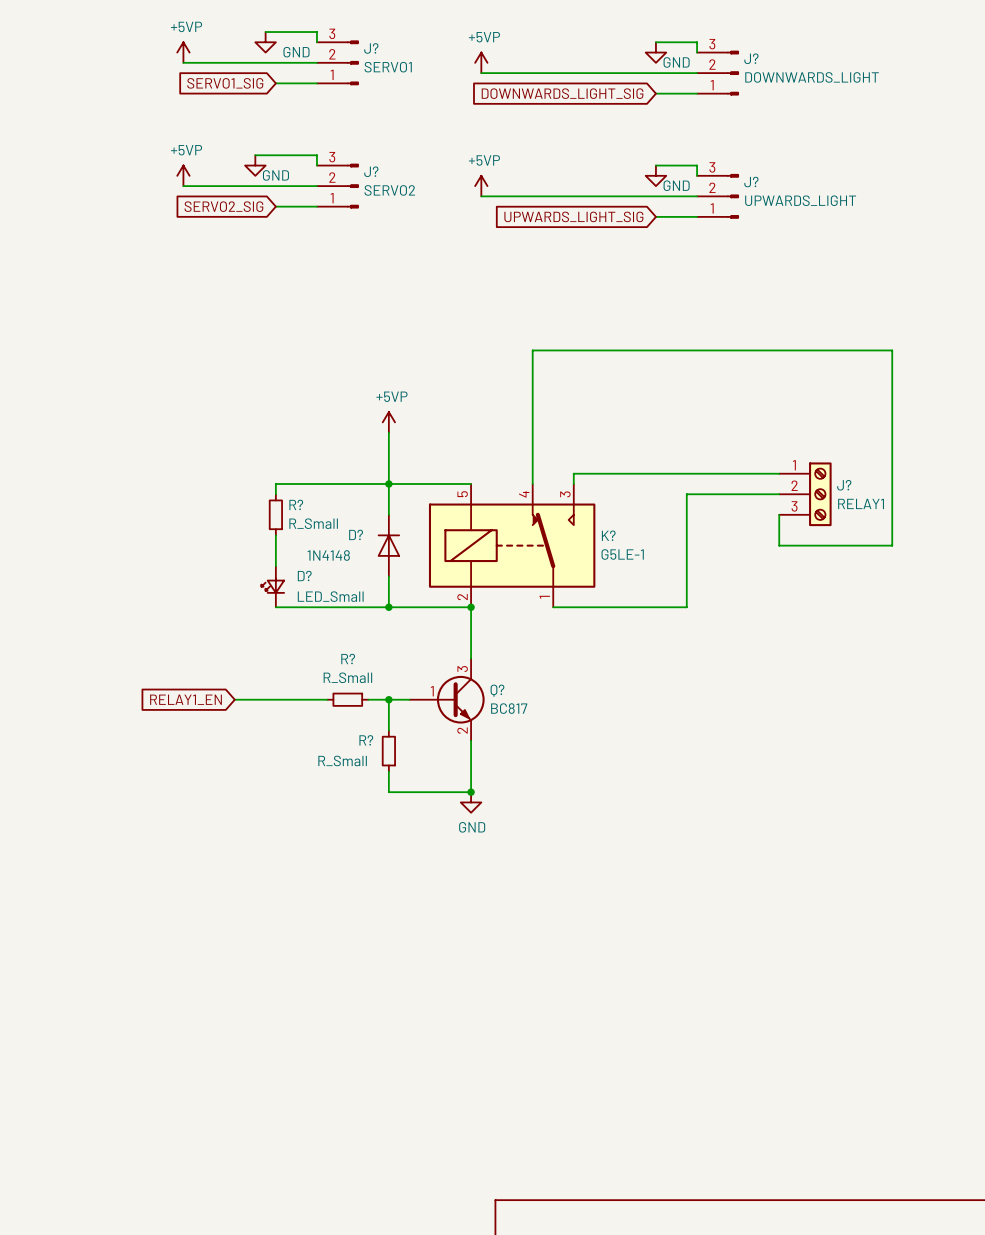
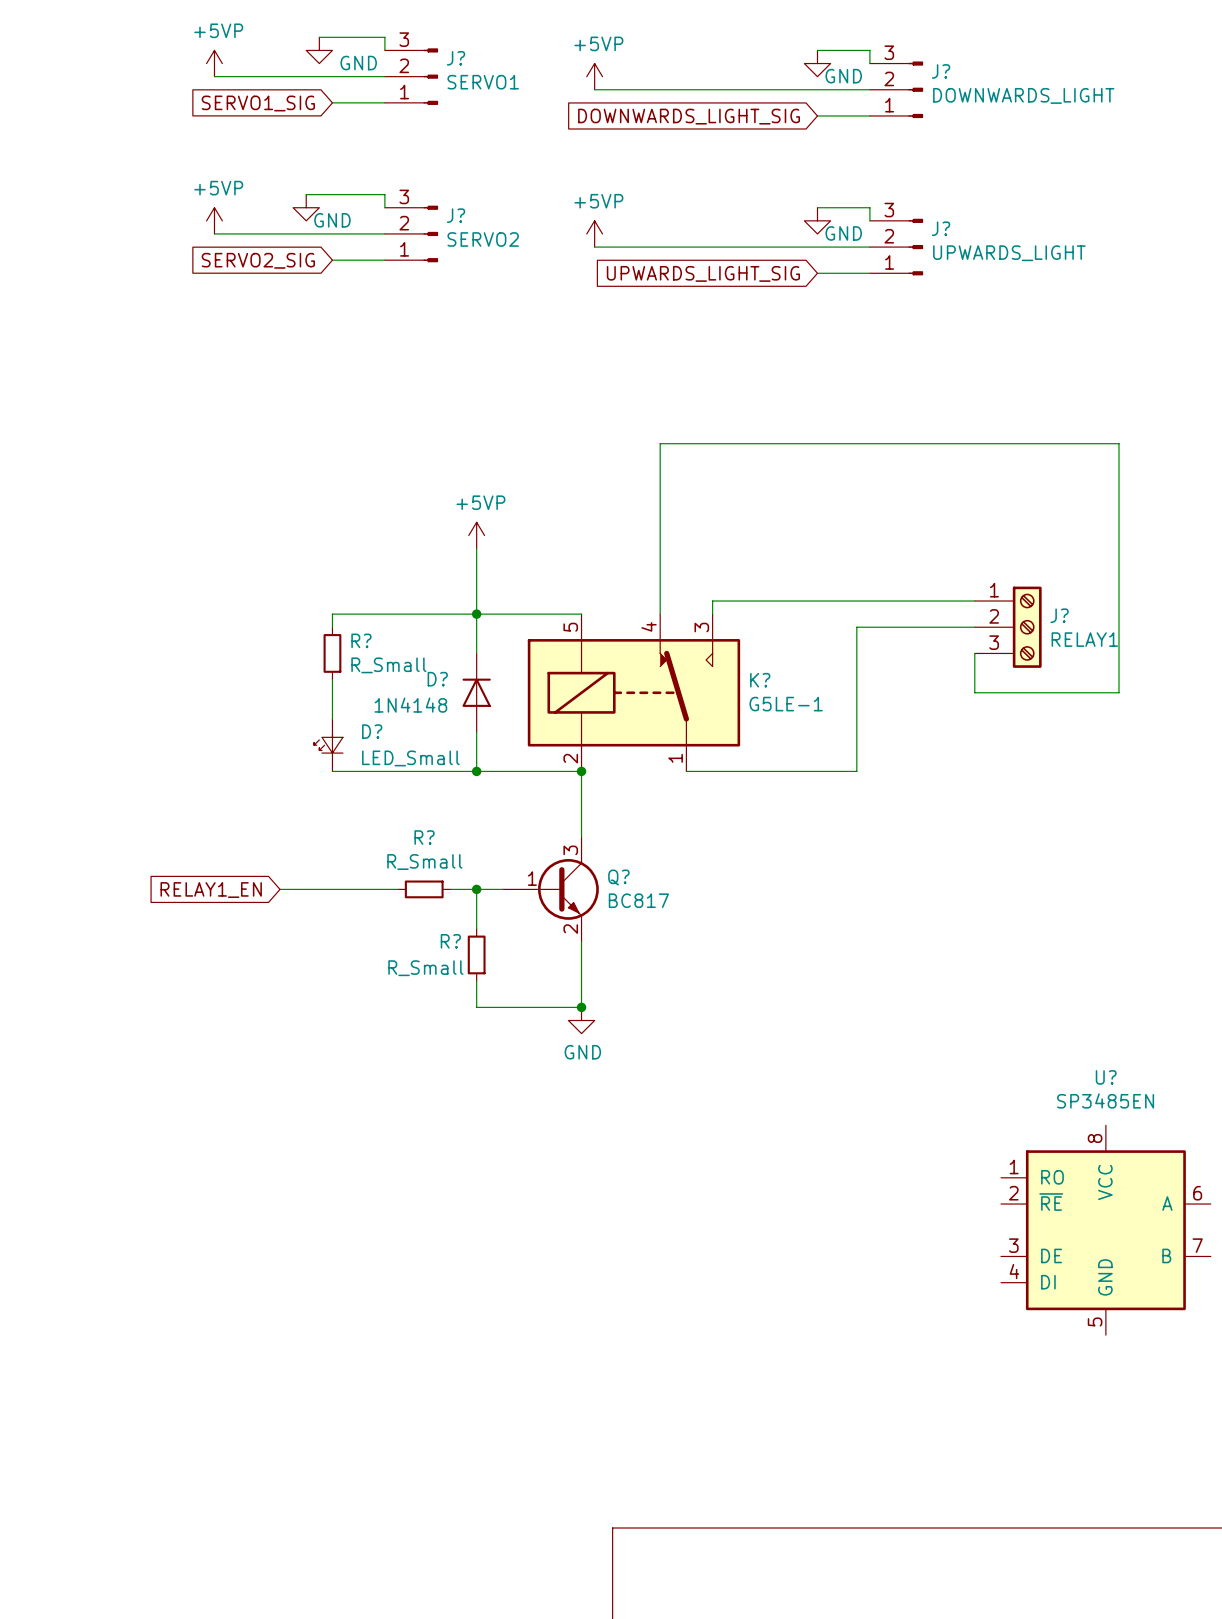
U?: none -> SP3485EN (1105, 1230)

